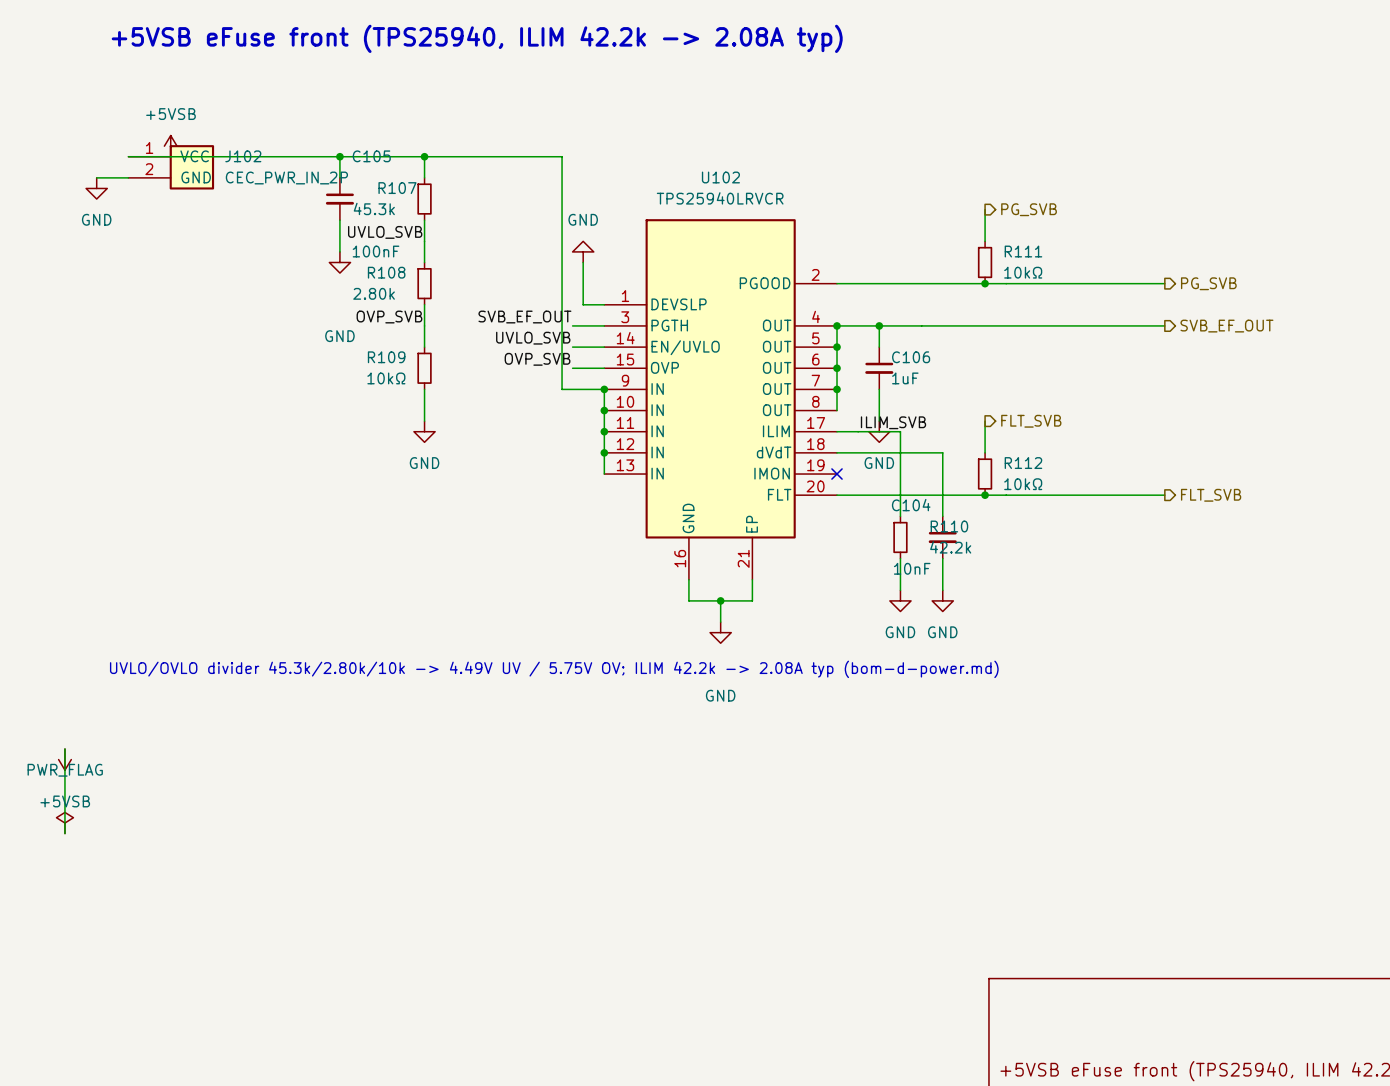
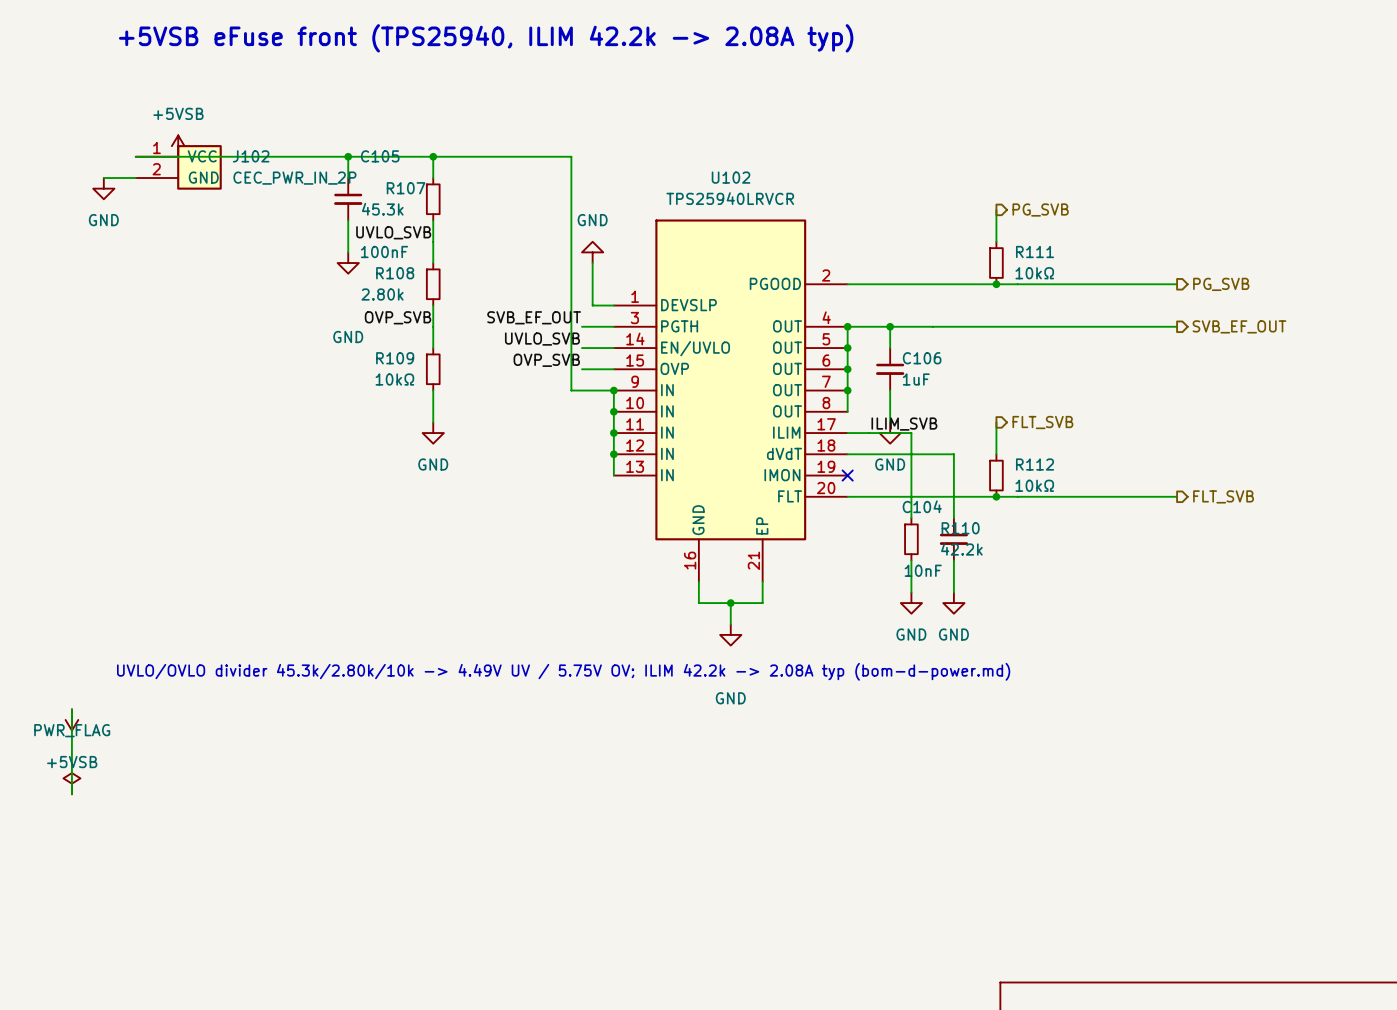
power symbol position: +5VSB (64, 759) -> +5VSB (71, 719)
wire: (64, 791) (64, 833) -> (71, 709) (71, 751)
power symbol position: PWR_FLAG (64, 823) -> PWR_FLAG (71, 783)

